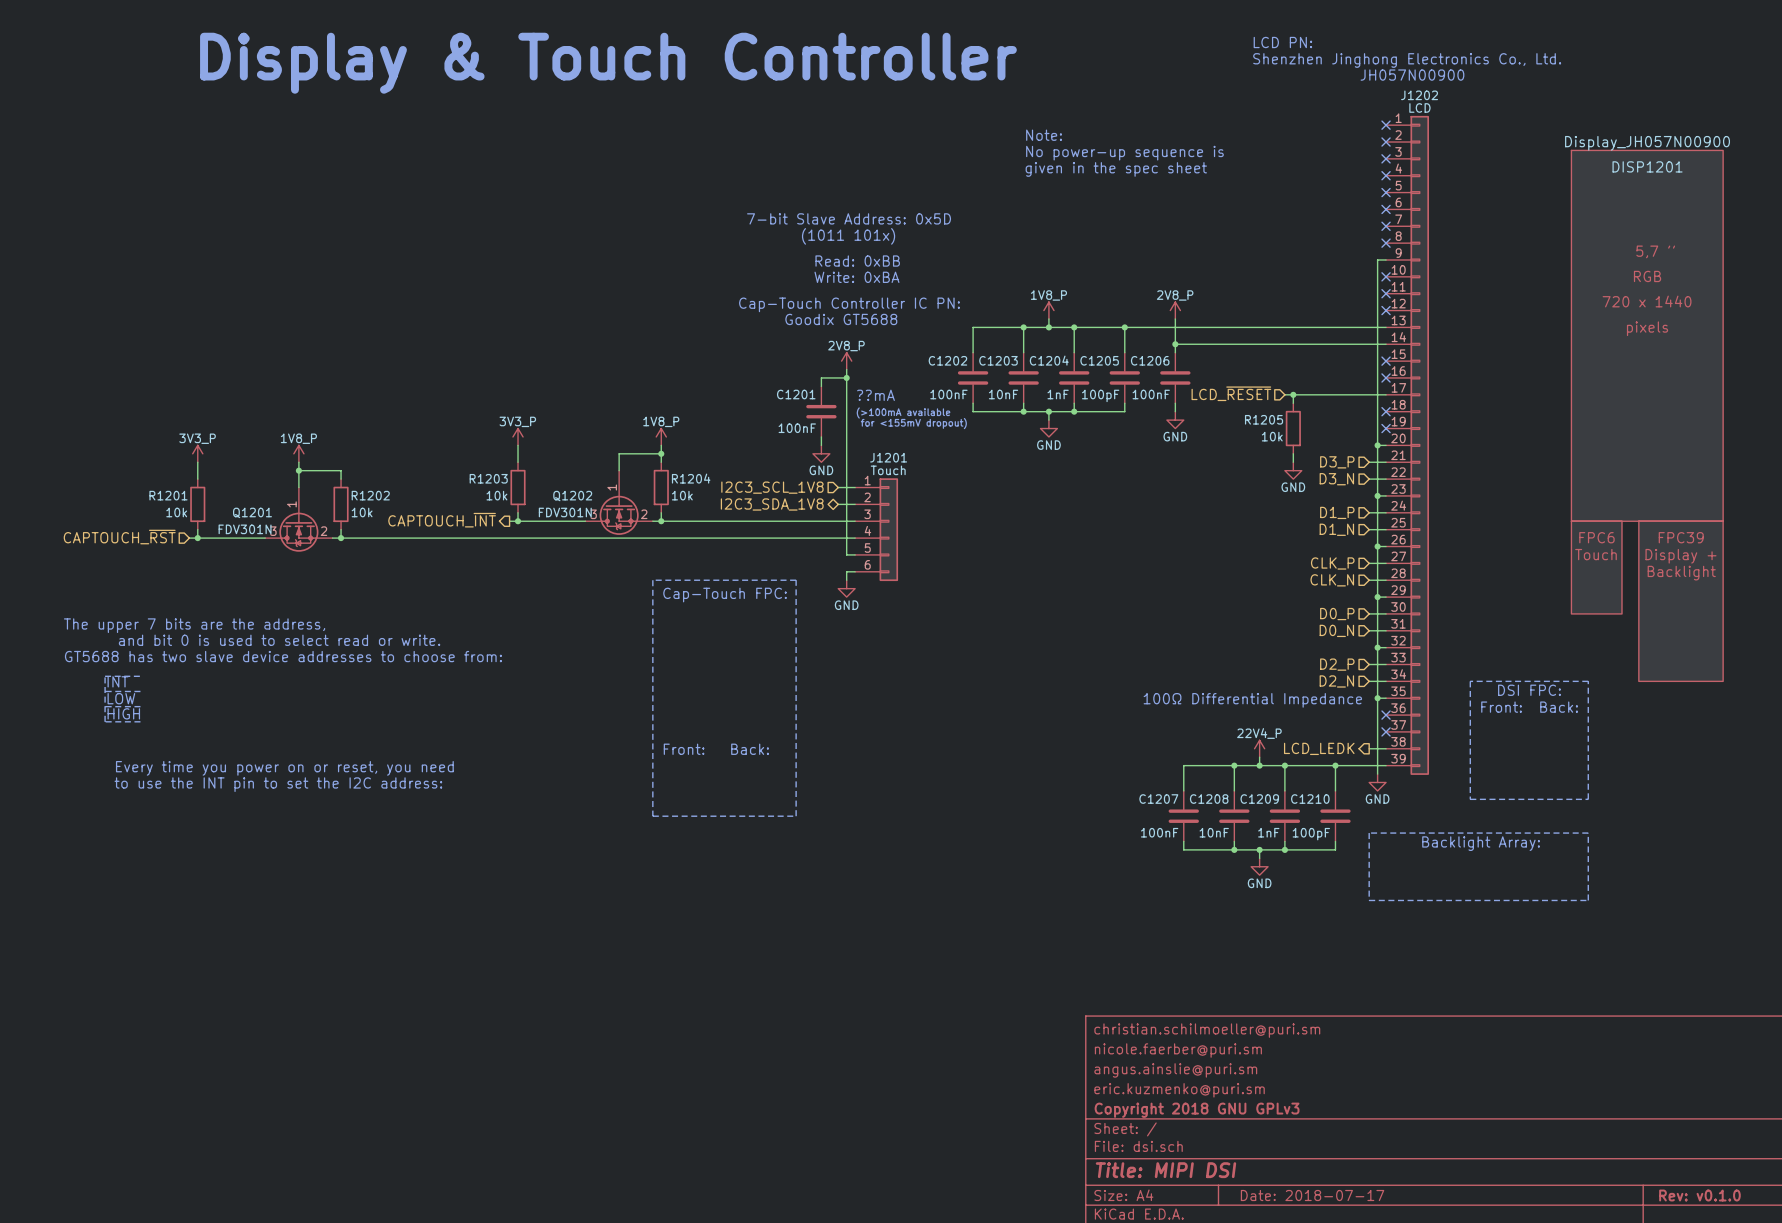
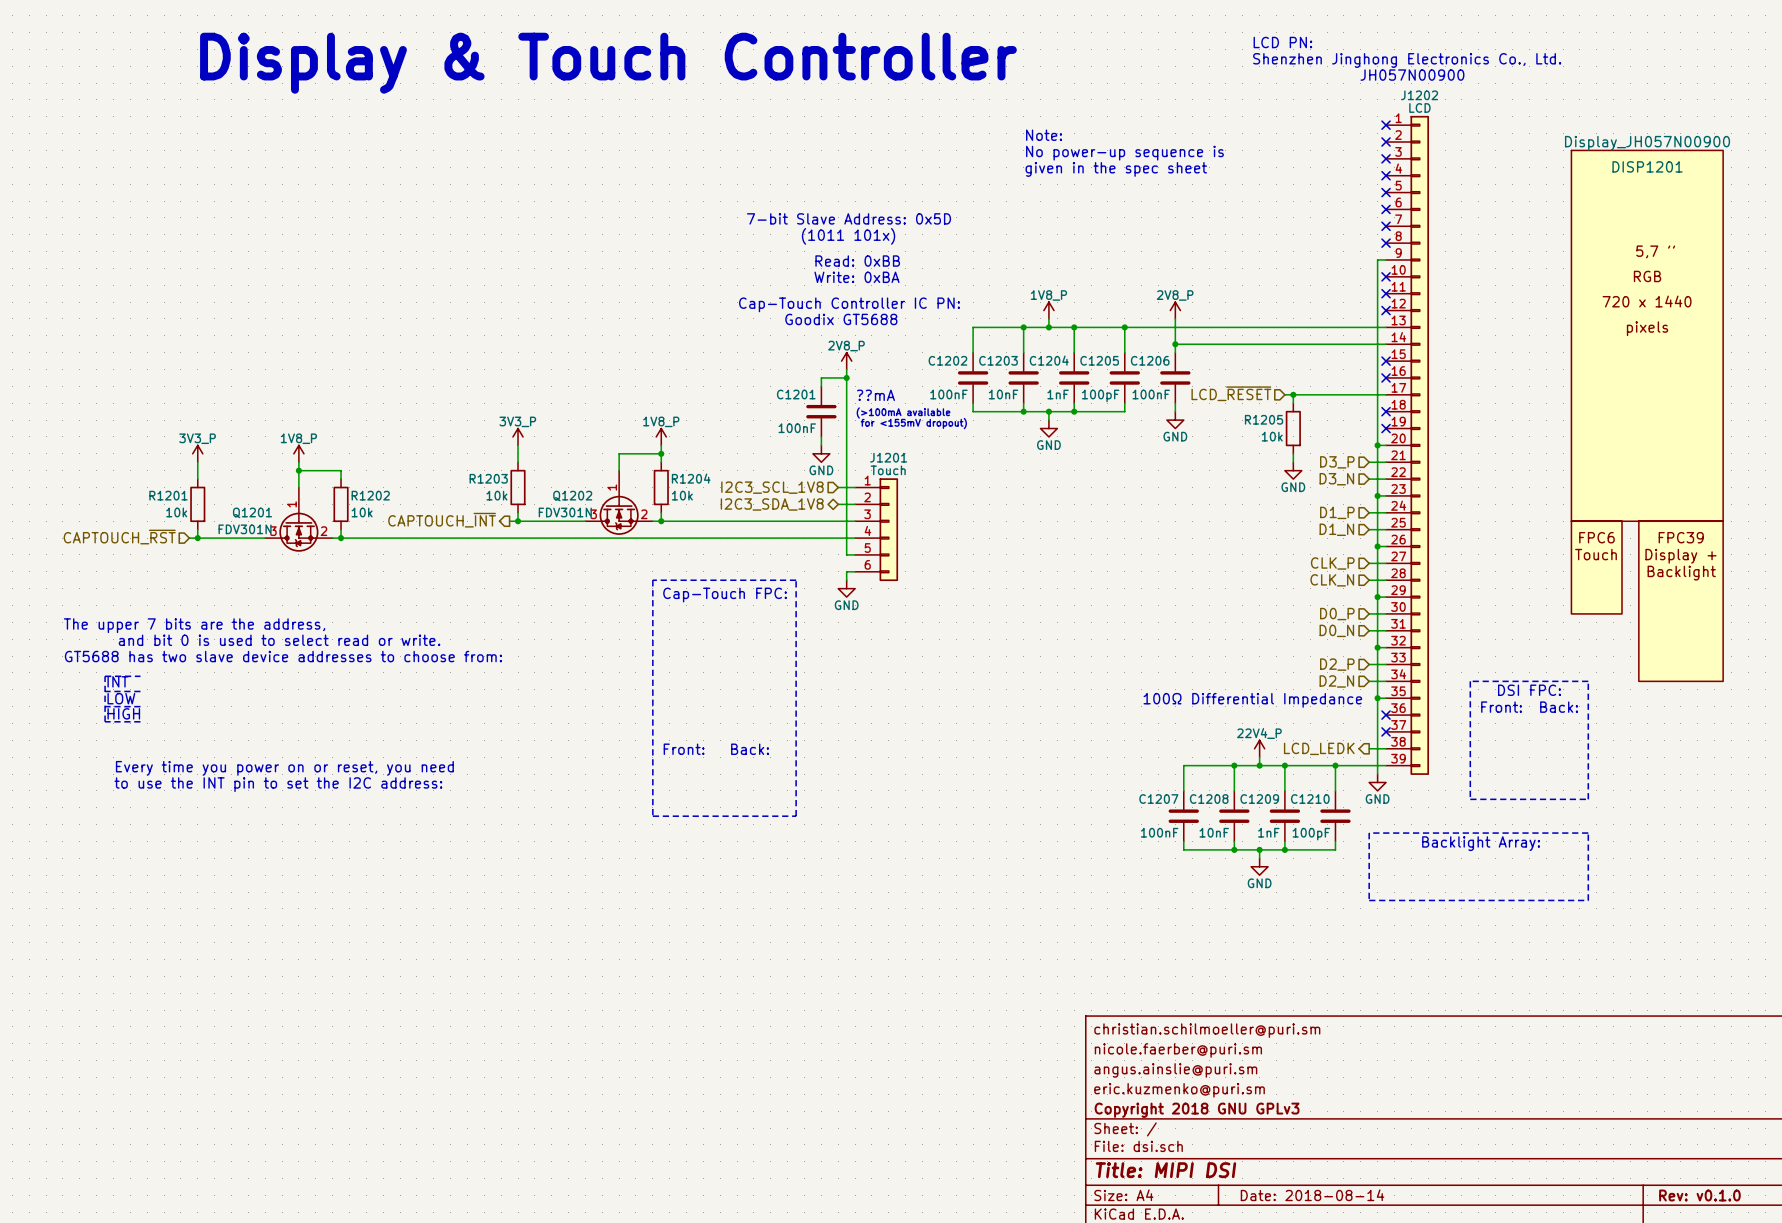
title block: Date: 2018-07-17 (1312, 1195) -> Date: 2018-08-14 (1312, 1195)

